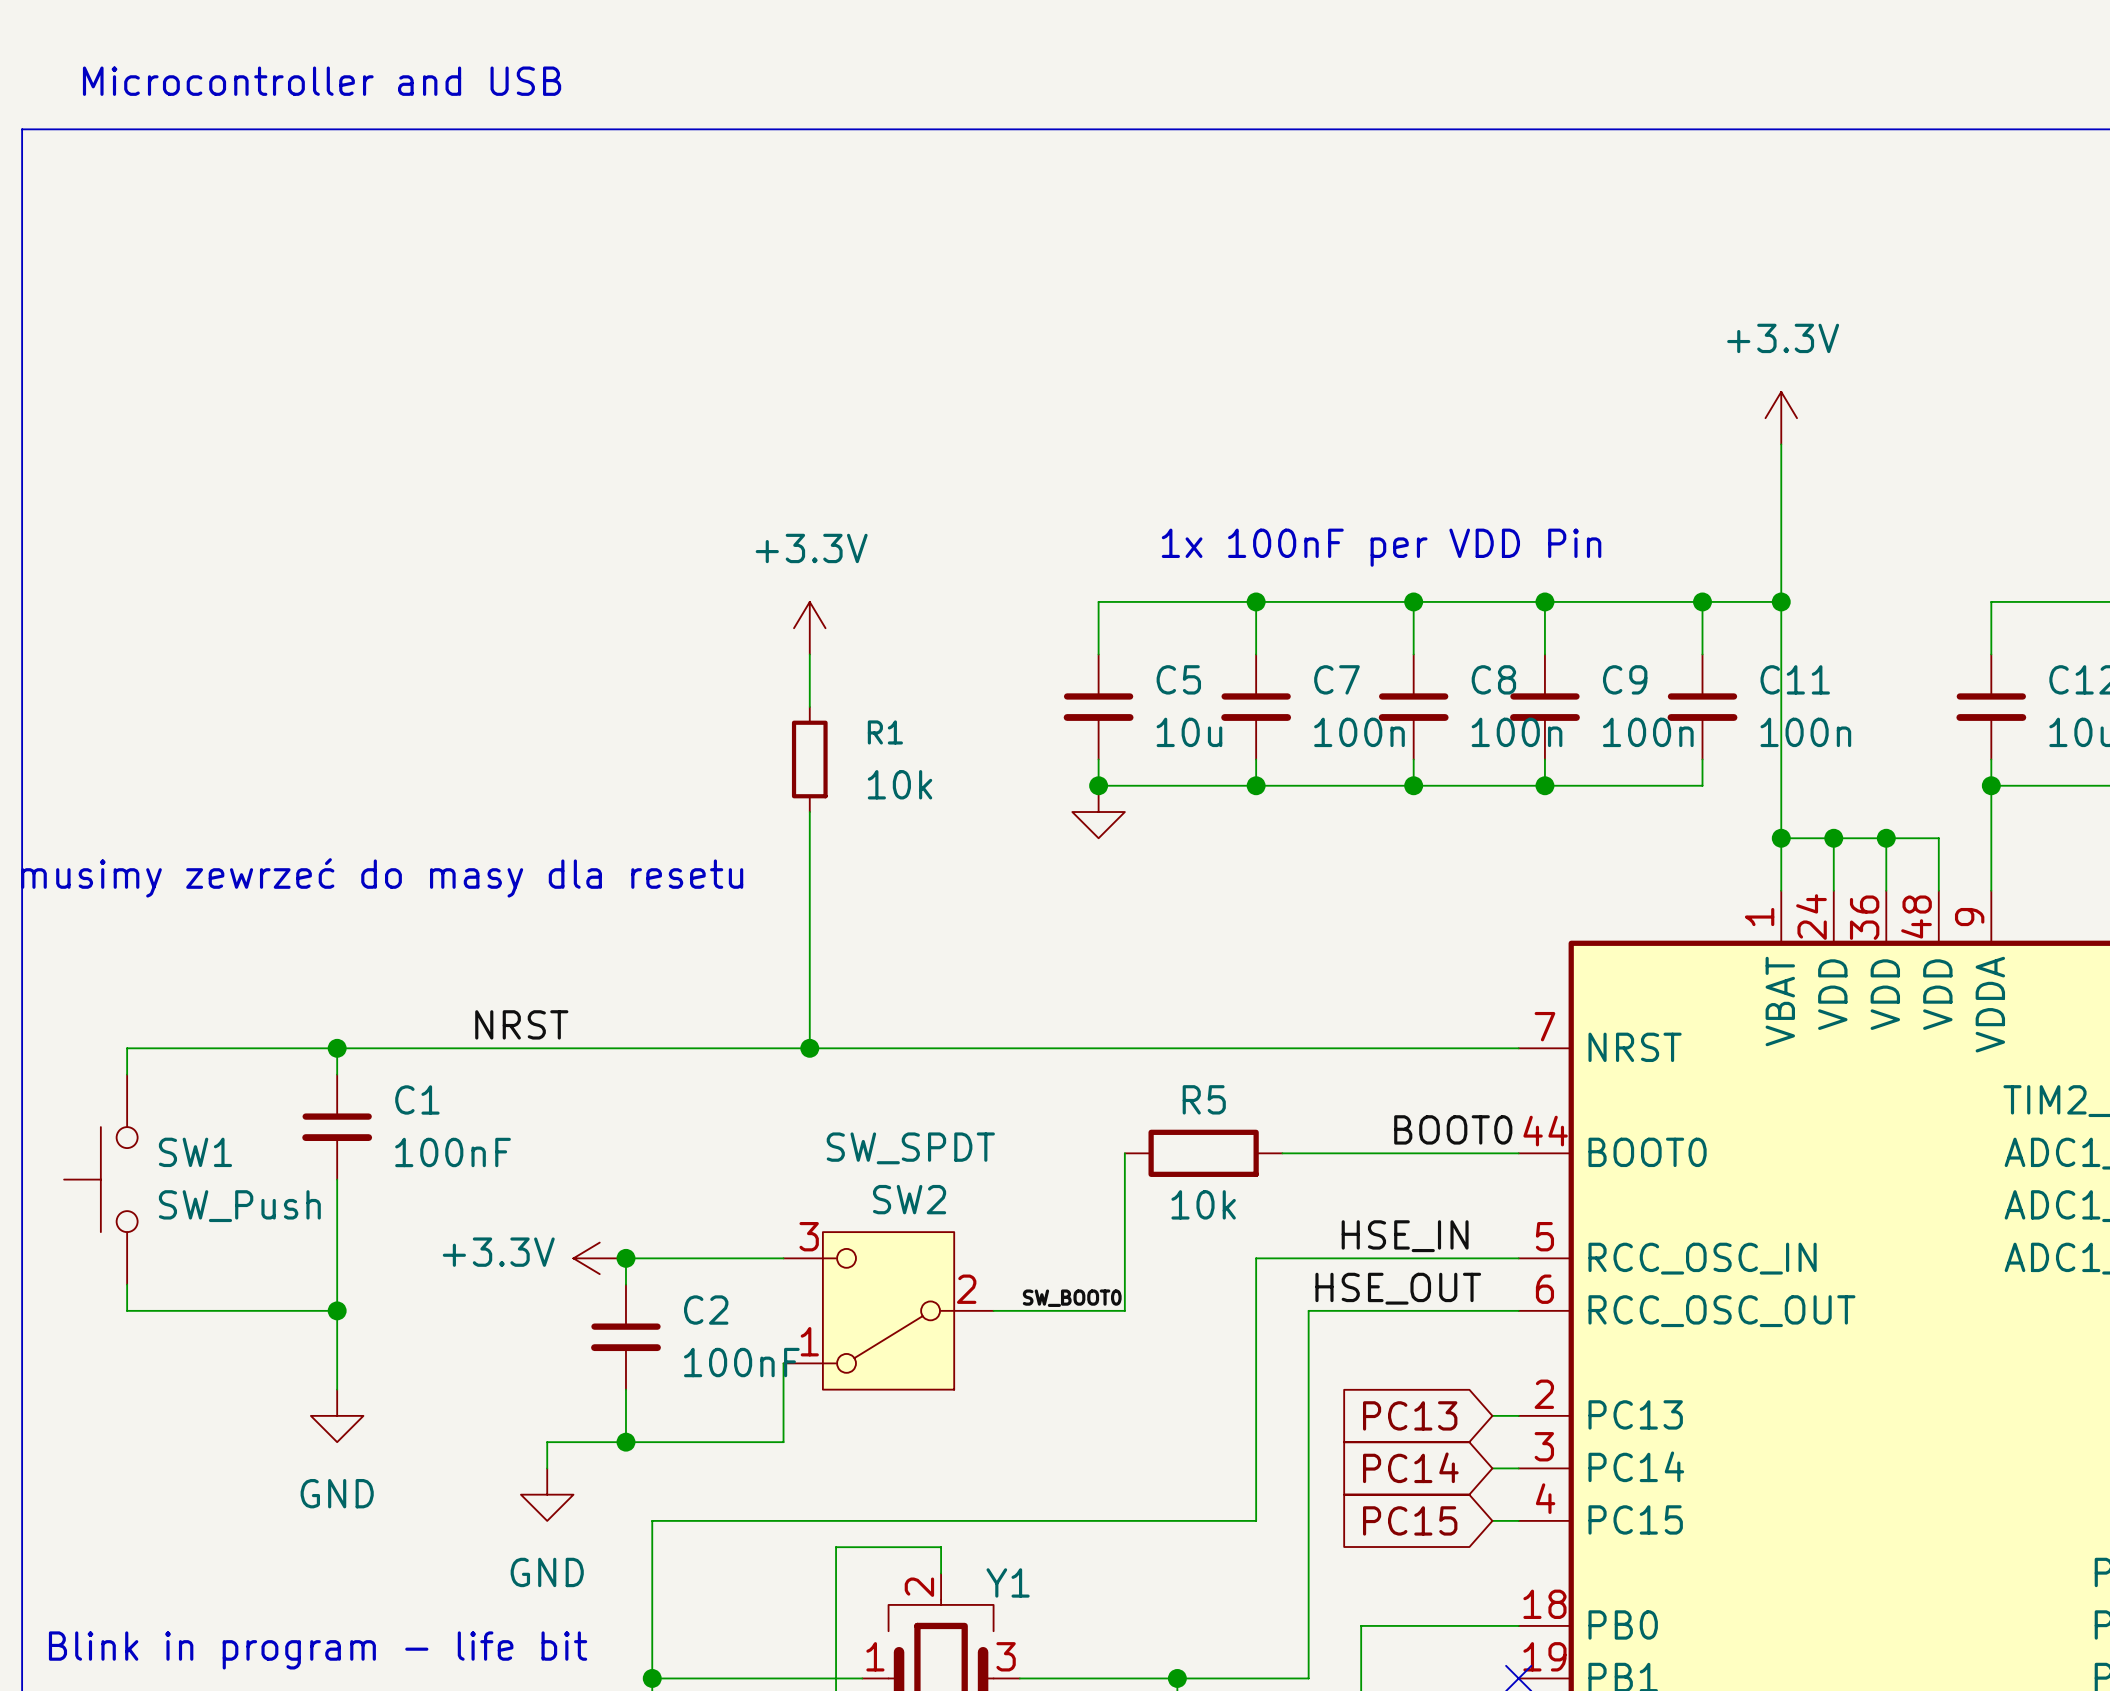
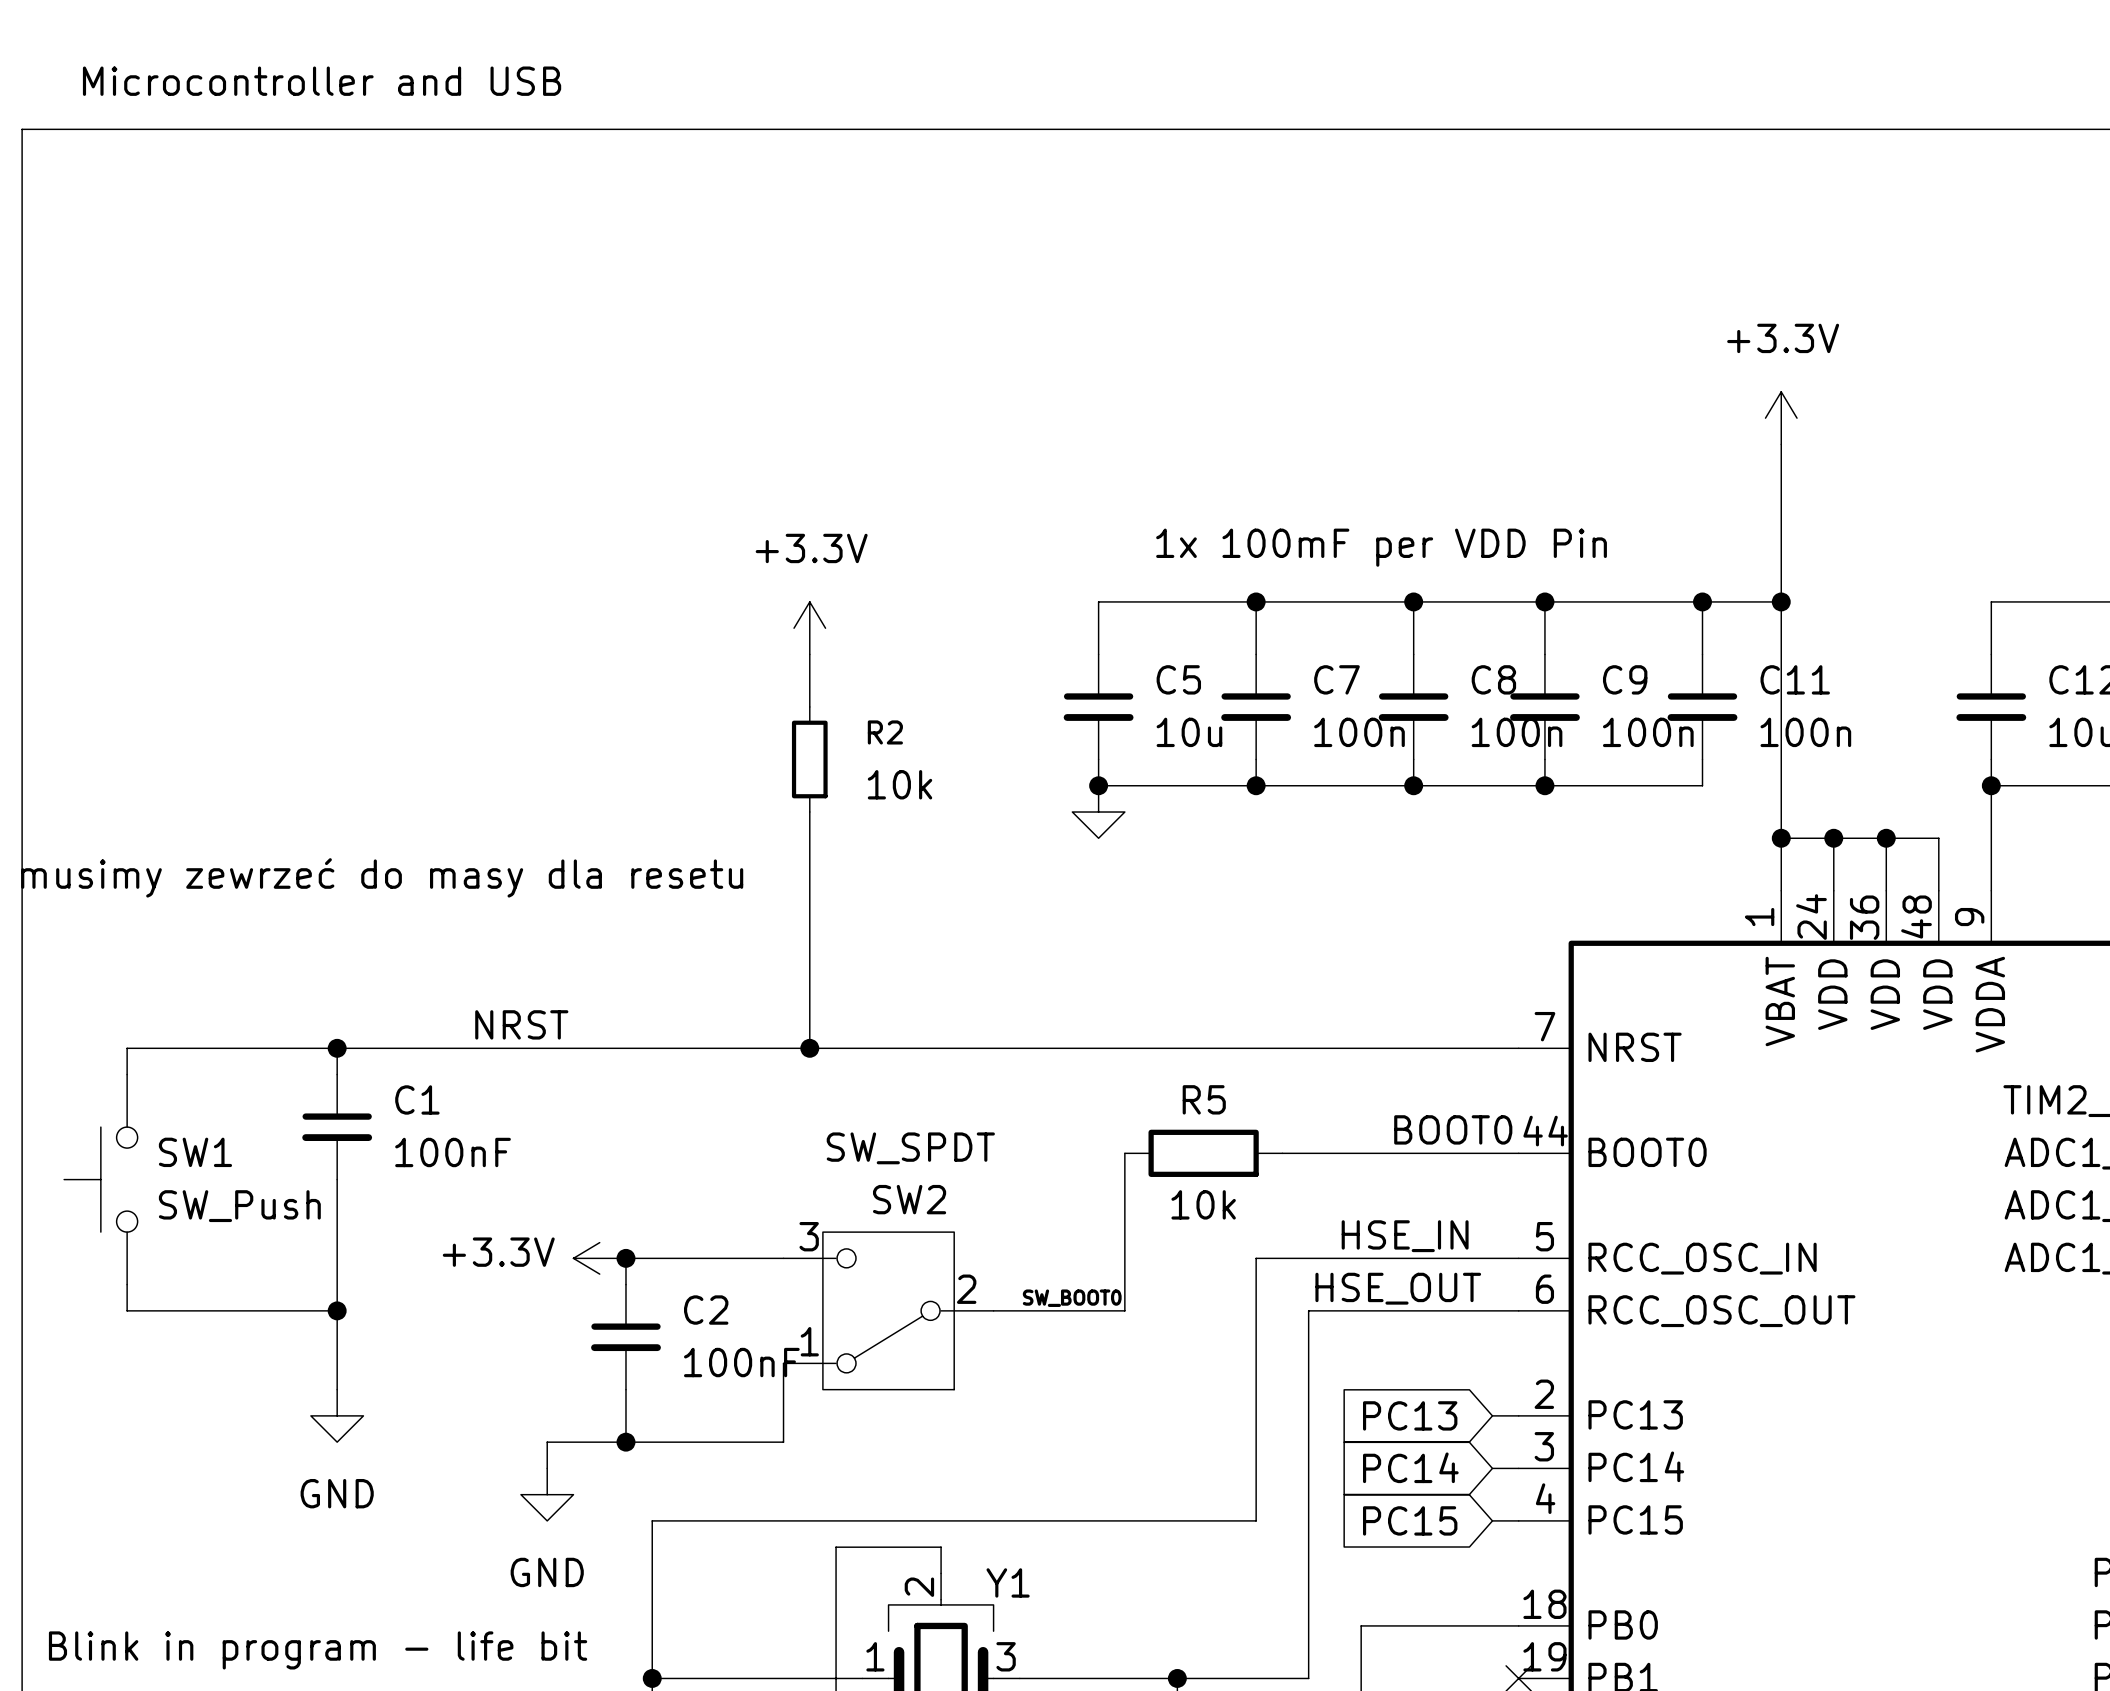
text: 1x 100nF per VDD Pin (1381, 547) -> 1x 100mF per VDD Pin (1381, 547)
R1 name: R1 (885, 732) -> R2 (885, 732)

